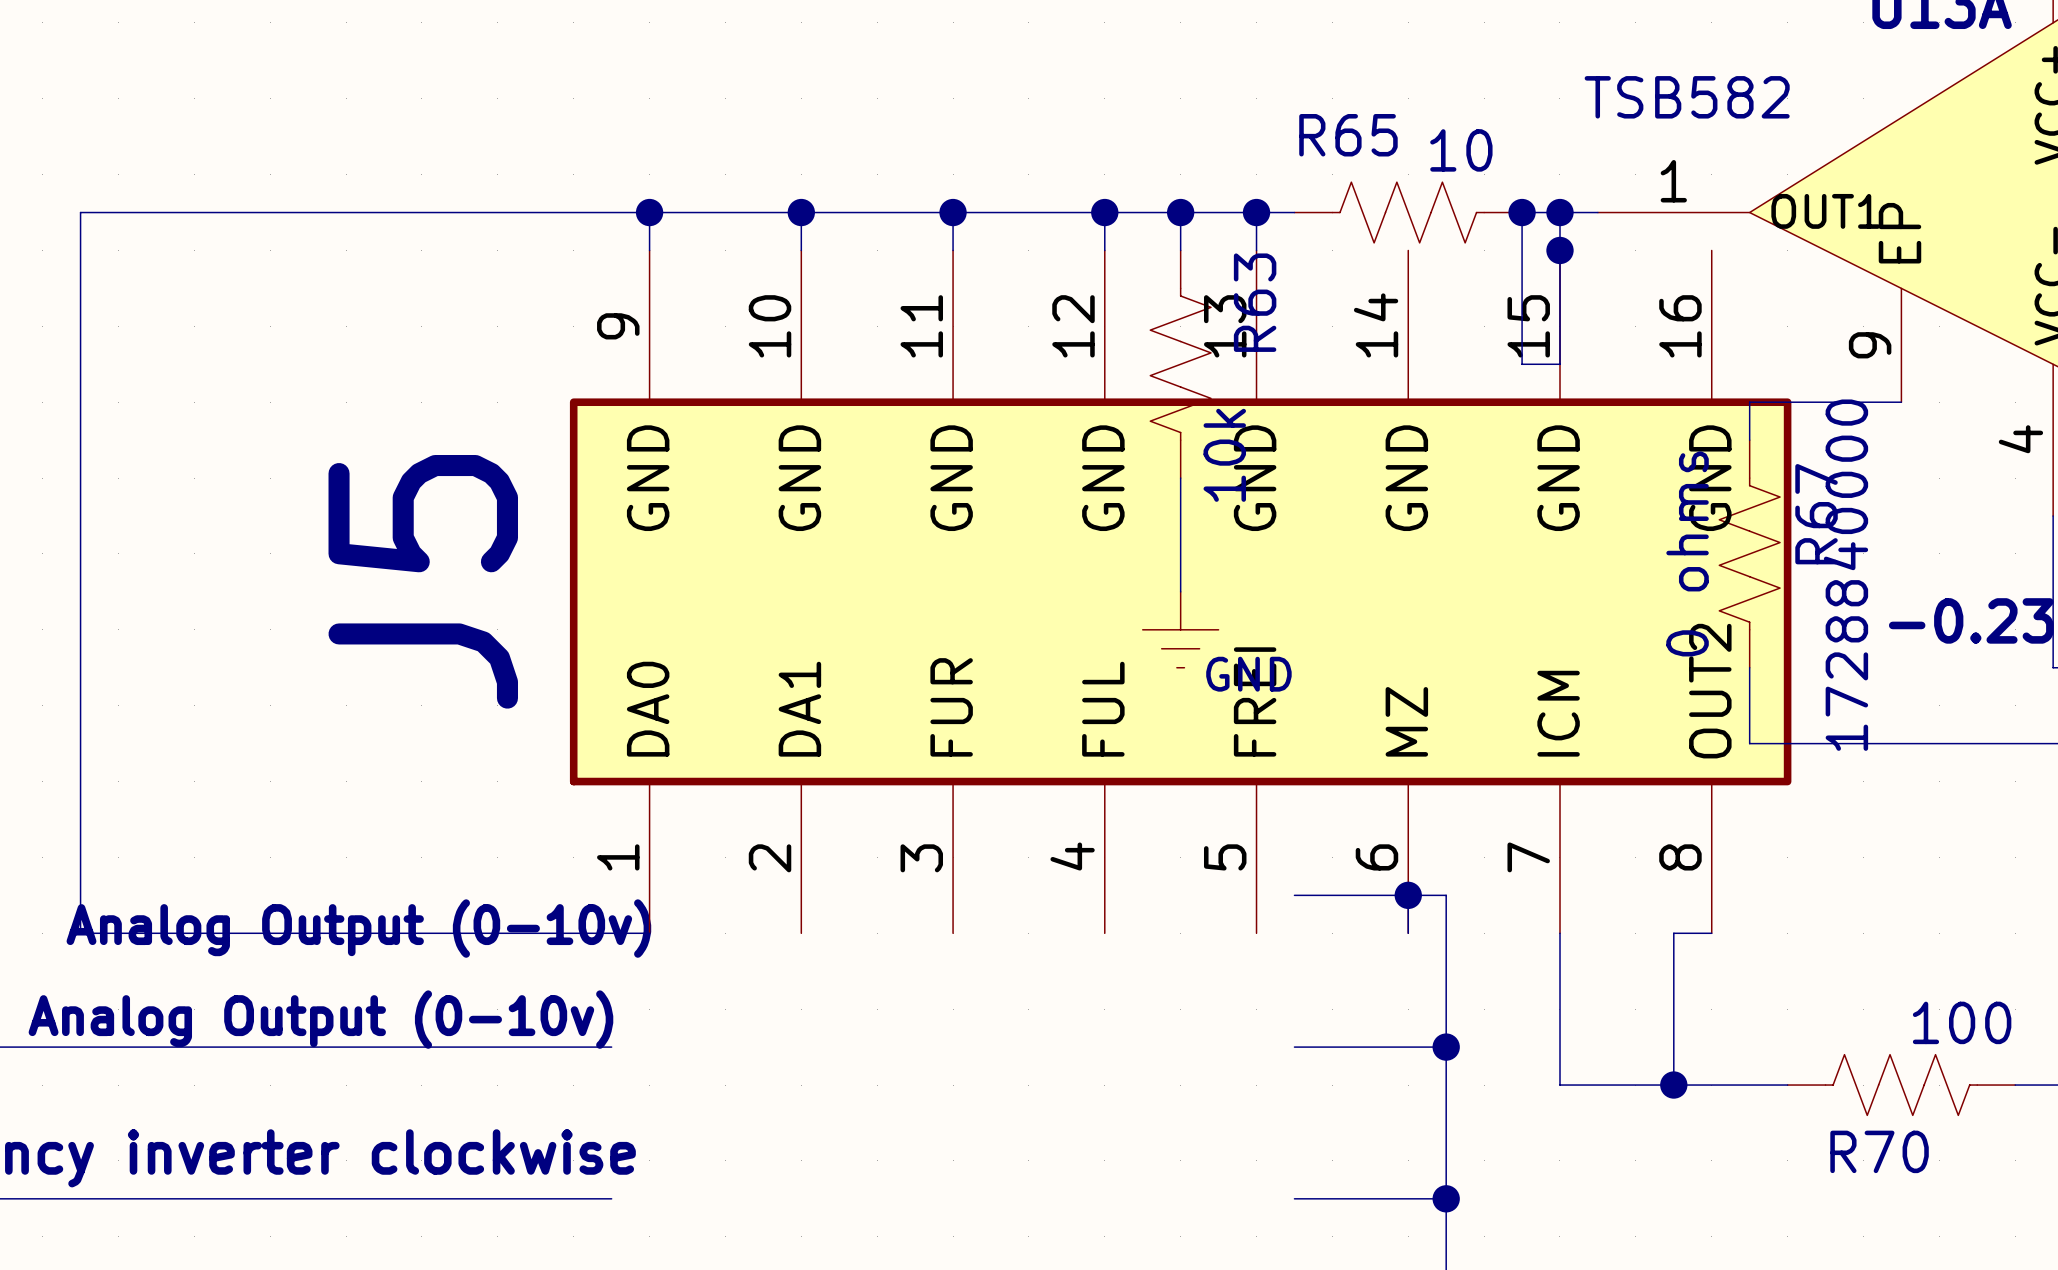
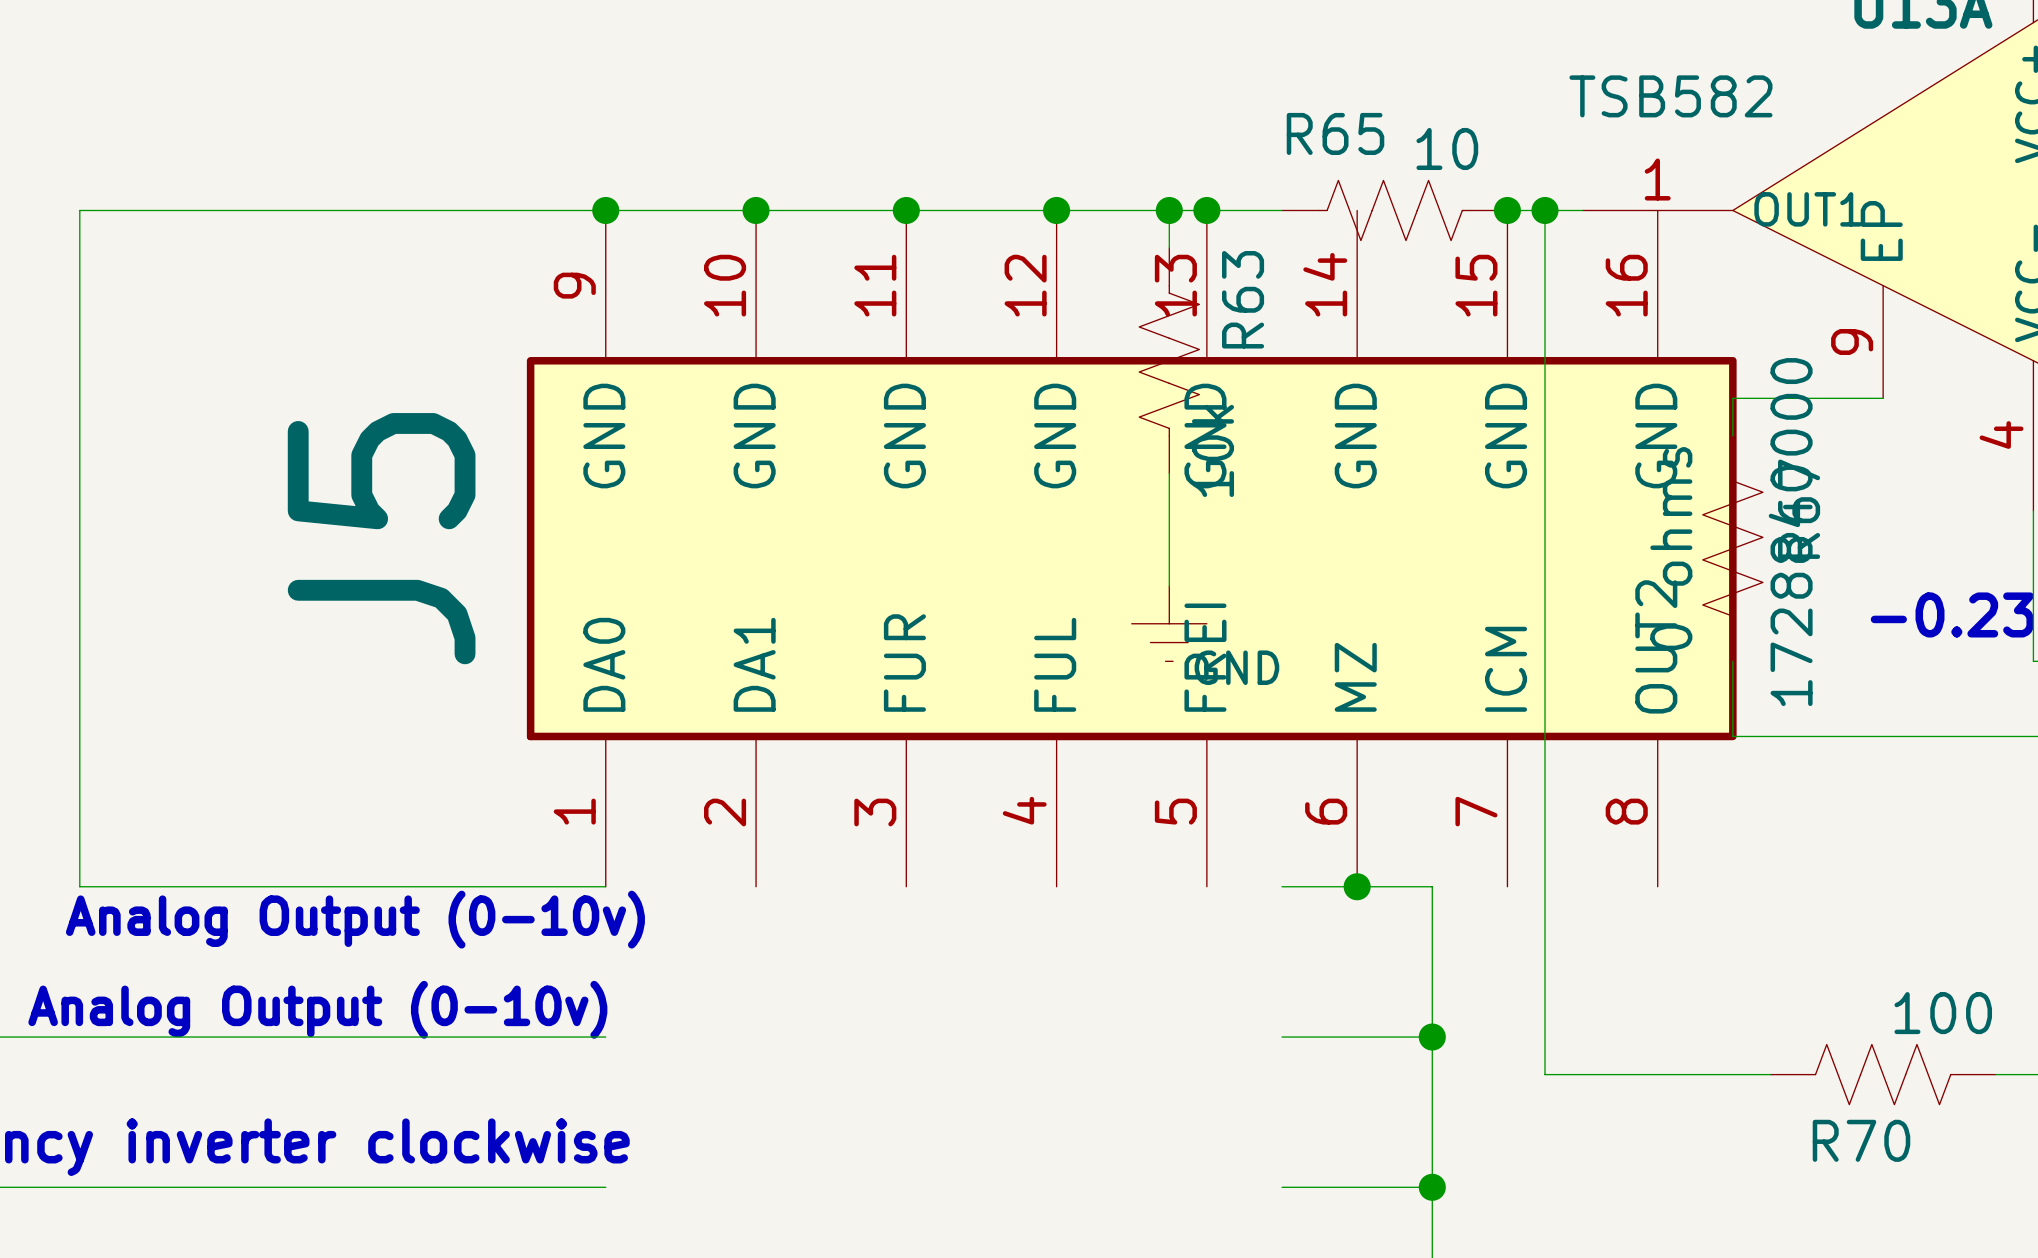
wire: (649, 212) (649, 250) -> none
junction position: (649, 212) -> (605, 210)
wire: (801, 212) (801, 250) -> none
junction position: (801, 212) -> (756, 210)
wire: (953, 212) (953, 250) -> none
junction position: (953, 212) -> (906, 210)
wire: (1104, 212) (1104, 250) -> none
junction position: (1104, 212) -> (1056, 210)
wire: (1256, 212) (1256, 250) -> none
junction position: (1256, 212) -> (1206, 210)
junction: (1559, 250) -> none
J5 position: (1180, 591) -> (1131, 548)
wire: (80, 895) (80, 933) (649, 933) -> (79, 886) (605, 886)
wire: (1408, 895) (1408, 933) -> none
junction position: (1408, 895) -> (1357, 886)
wire: (1711, 933) (1673, 933) (1673, 1085) -> none
junction: (1673, 1085) -> none

